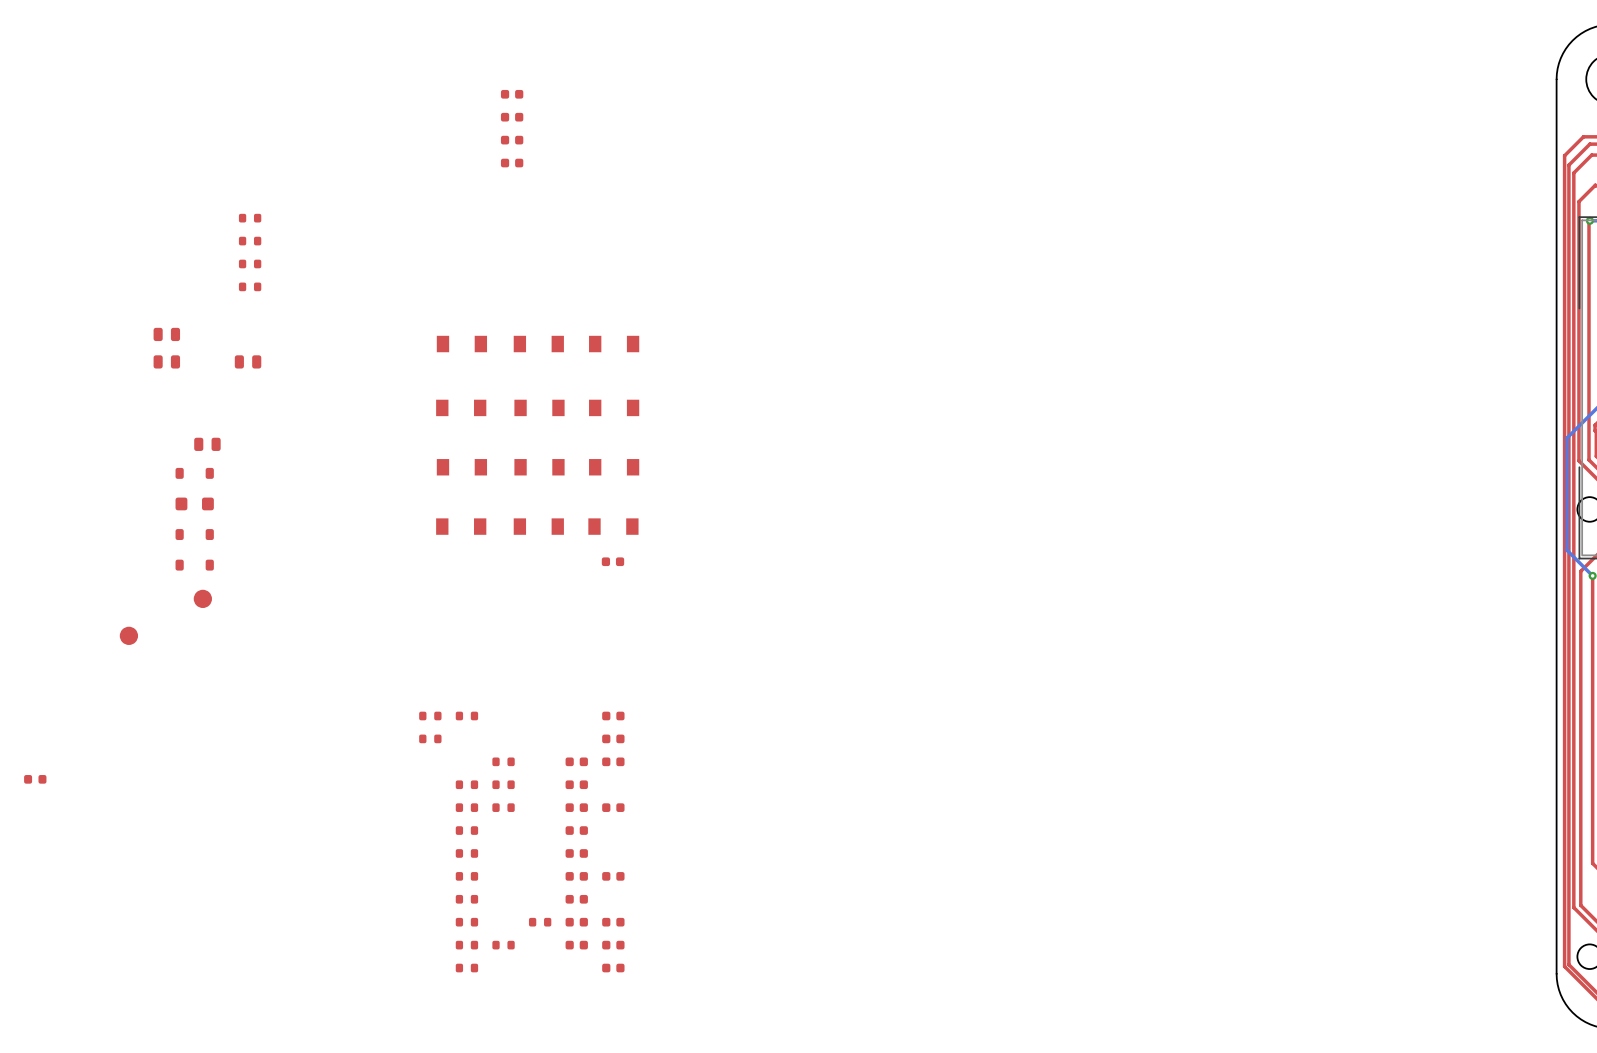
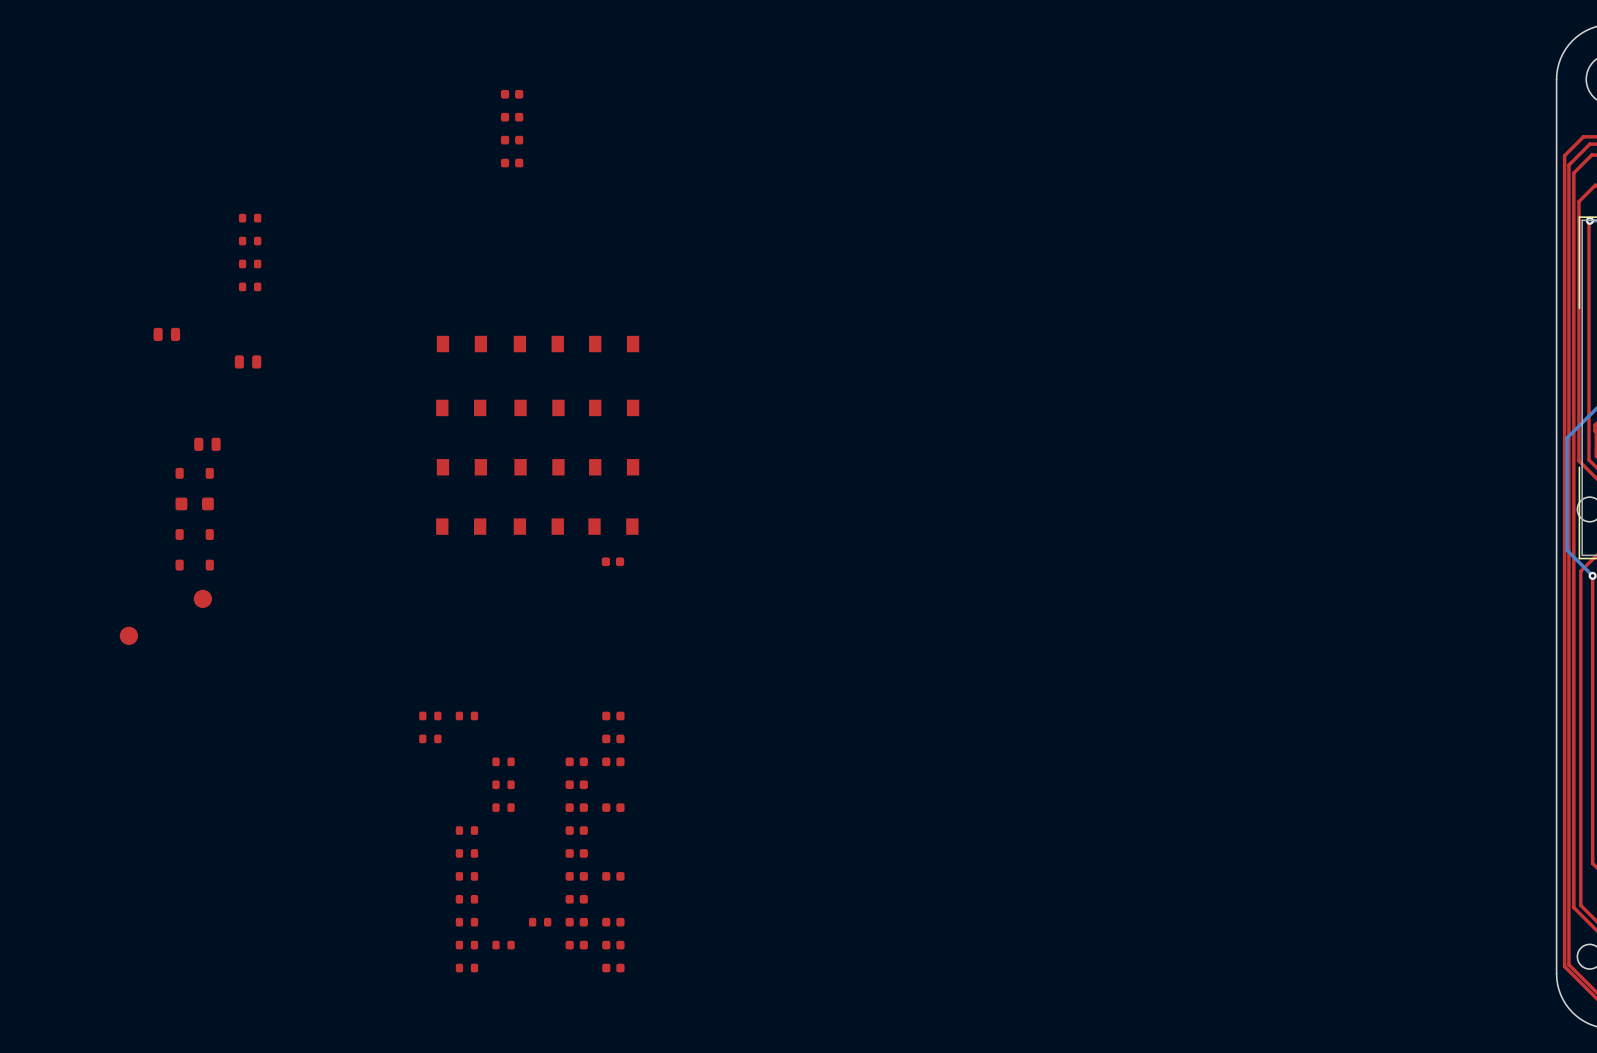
part: (166, 361) -> none
part: (35, 779) -> none
part: (466, 784) -> none
part: (466, 807) -> none

